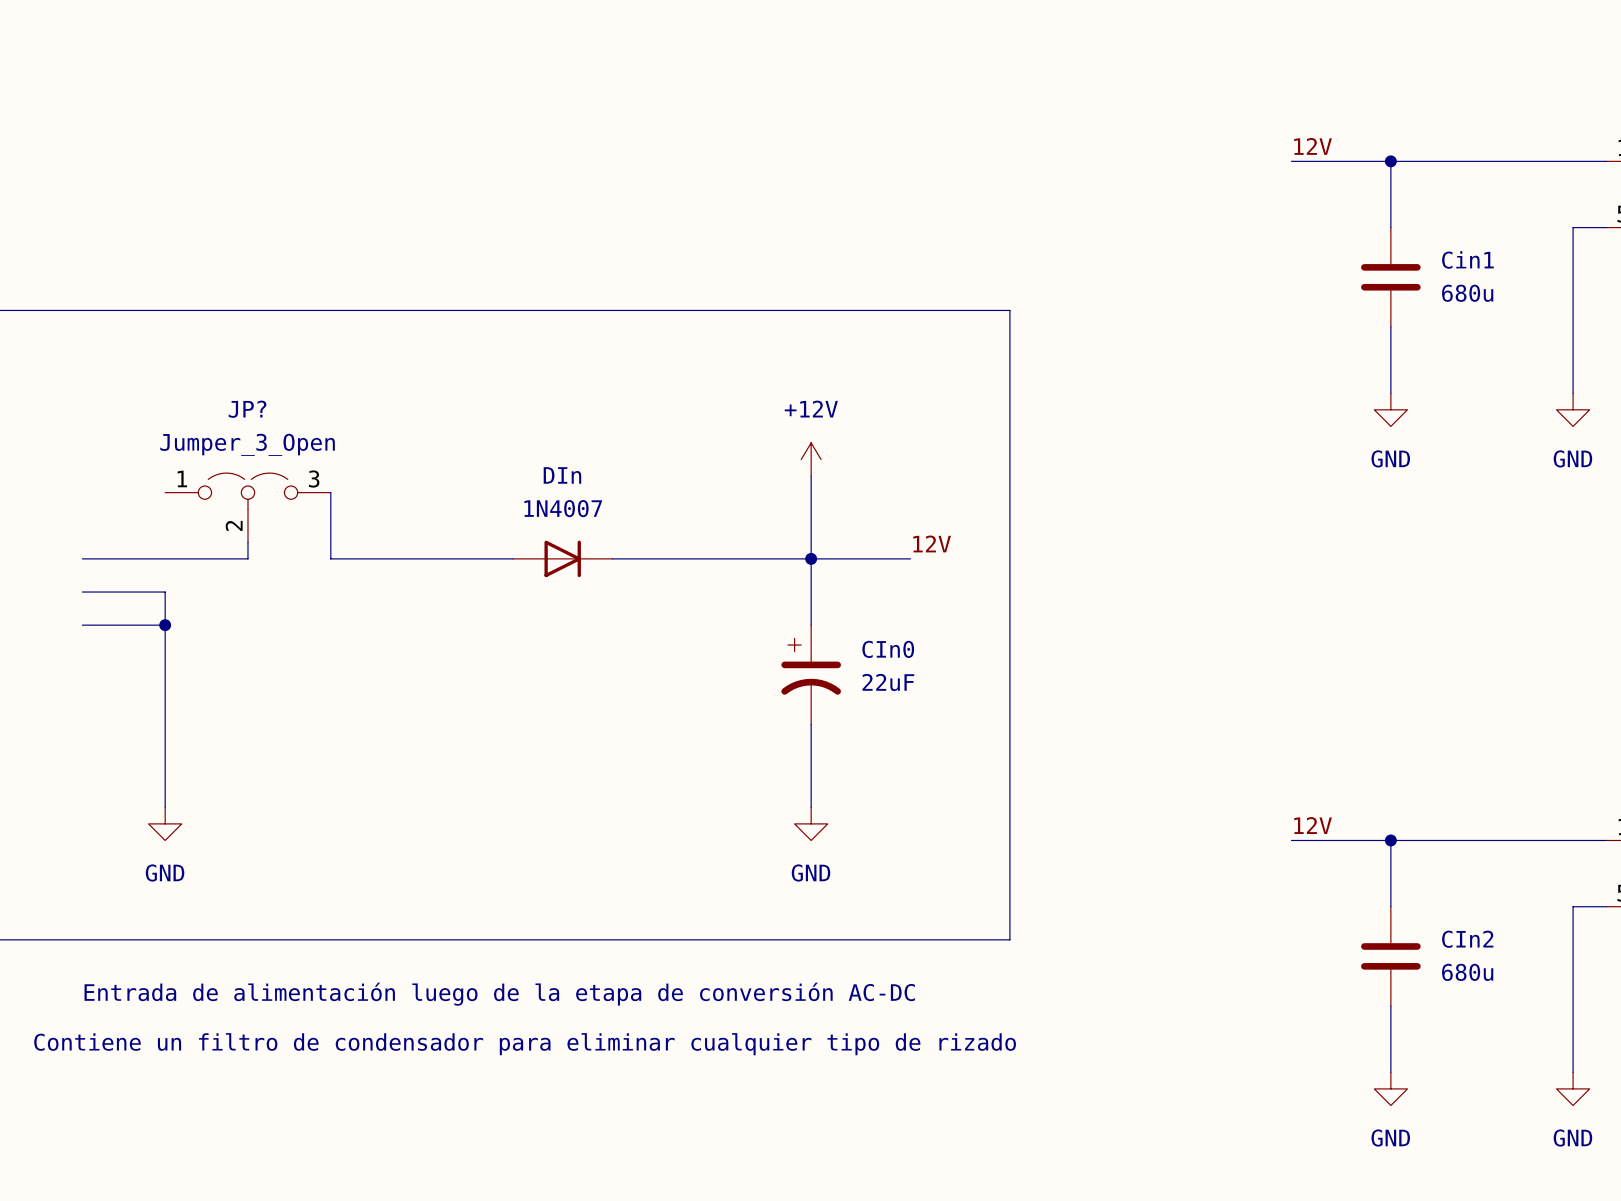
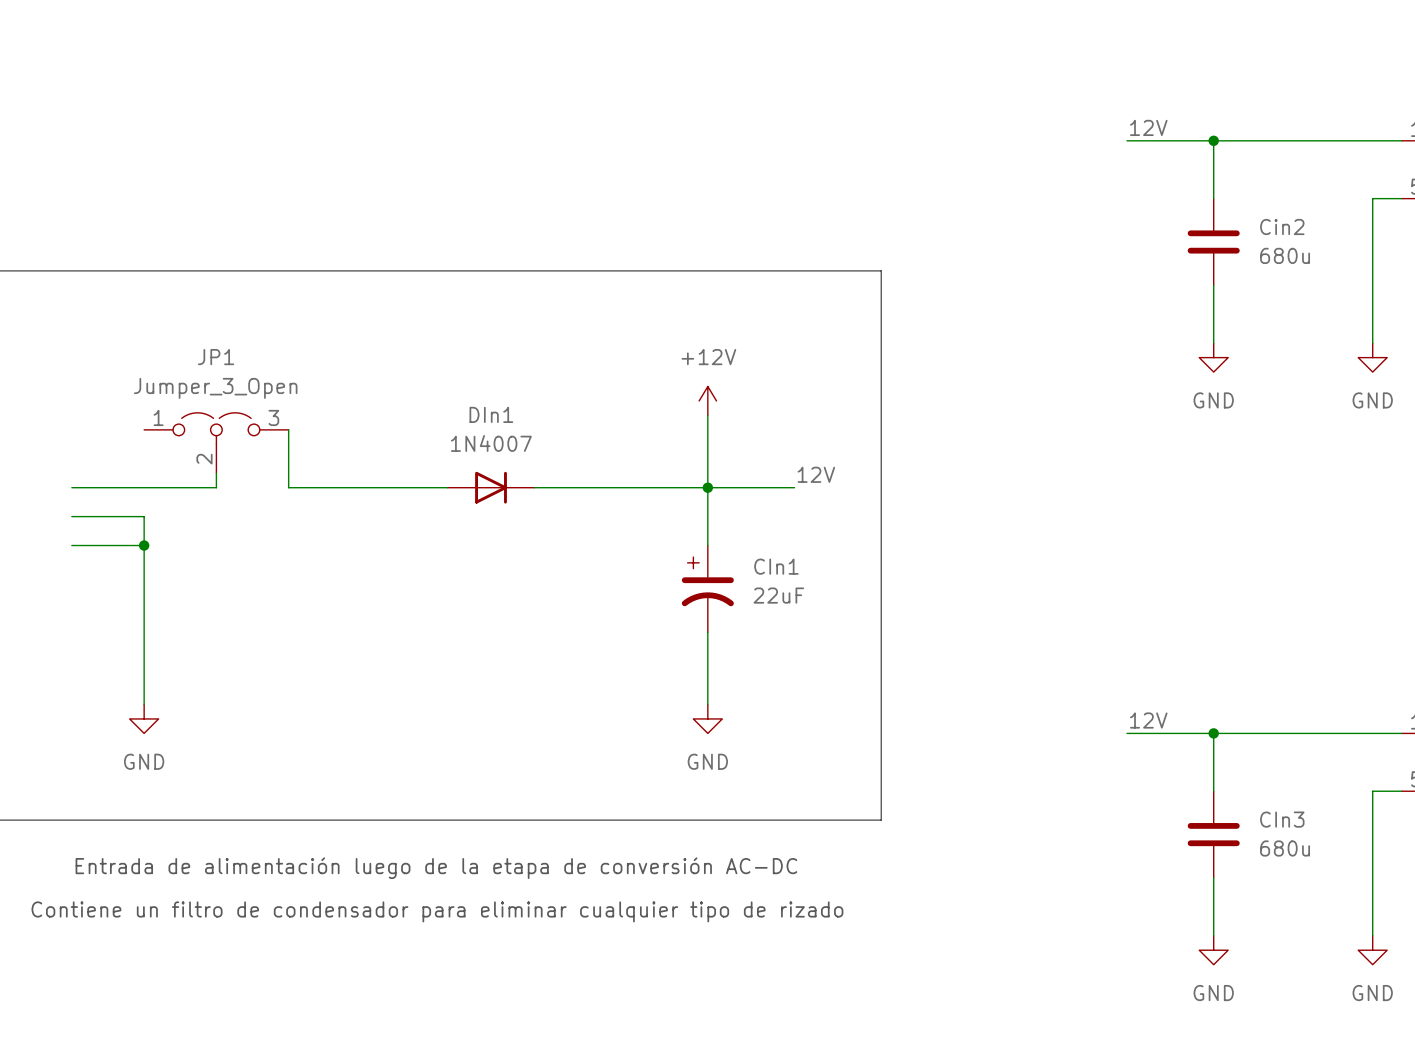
Cin1 name: Cin1 (1467, 259) -> Cin2 (1282, 226)
JP? name: JP? (247, 409) -> JP1 (216, 357)
DIn name: DIn (562, 475) -> DIn1 (491, 414)
CIn0 name: CIn0 (888, 649) -> CIn1 (776, 566)
CIn2 name: CIn2 (1467, 939) -> CIn3 (1282, 819)

